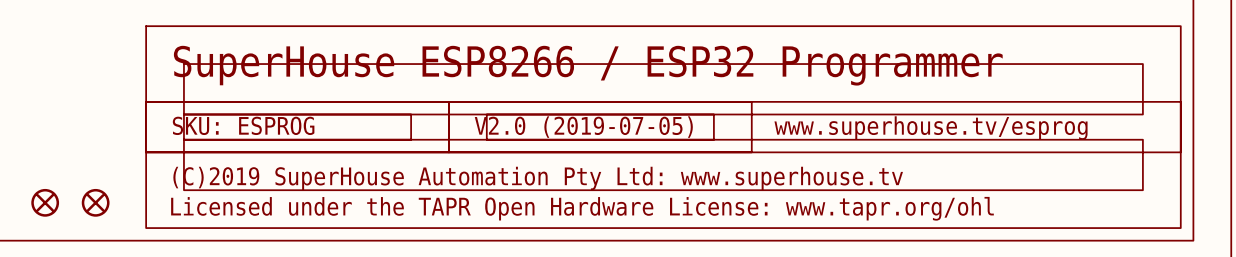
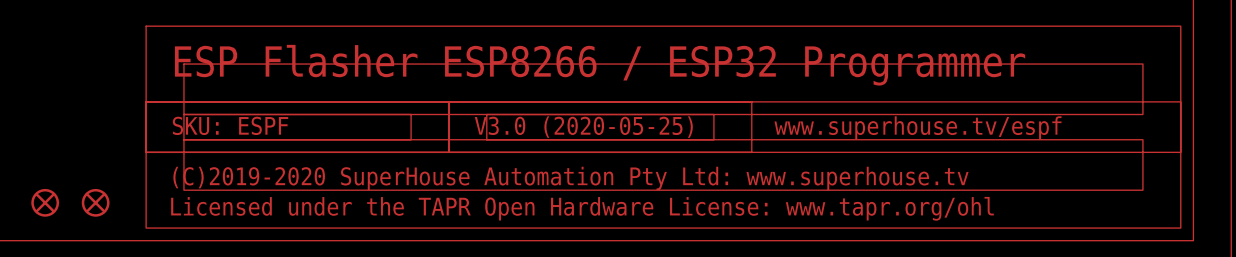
text: SuperHouse ESP8266 / ESP32 Programmer (588, 65) -> ESP Flasher ESP8266 / ESP32 Programmer (600, 65)
text: SKU: ESPROG (243, 125) -> SKU: ESPF (230, 125)
text: V2.0 (2019-07-05) (583, 127) -> V3.0 (2020-05-25) (583, 127)
text: www.superhouse.tv/esprog (931, 128) -> www.superhouse.tv/espf (918, 128)
text: (C)2019 SuperHouse Automation Pty Ltd: www.superhouse.tv (538, 178) -> (C)2019-2020 SuperHouse Automation Pty Ltd: www.superhouse.tv (570, 178)

